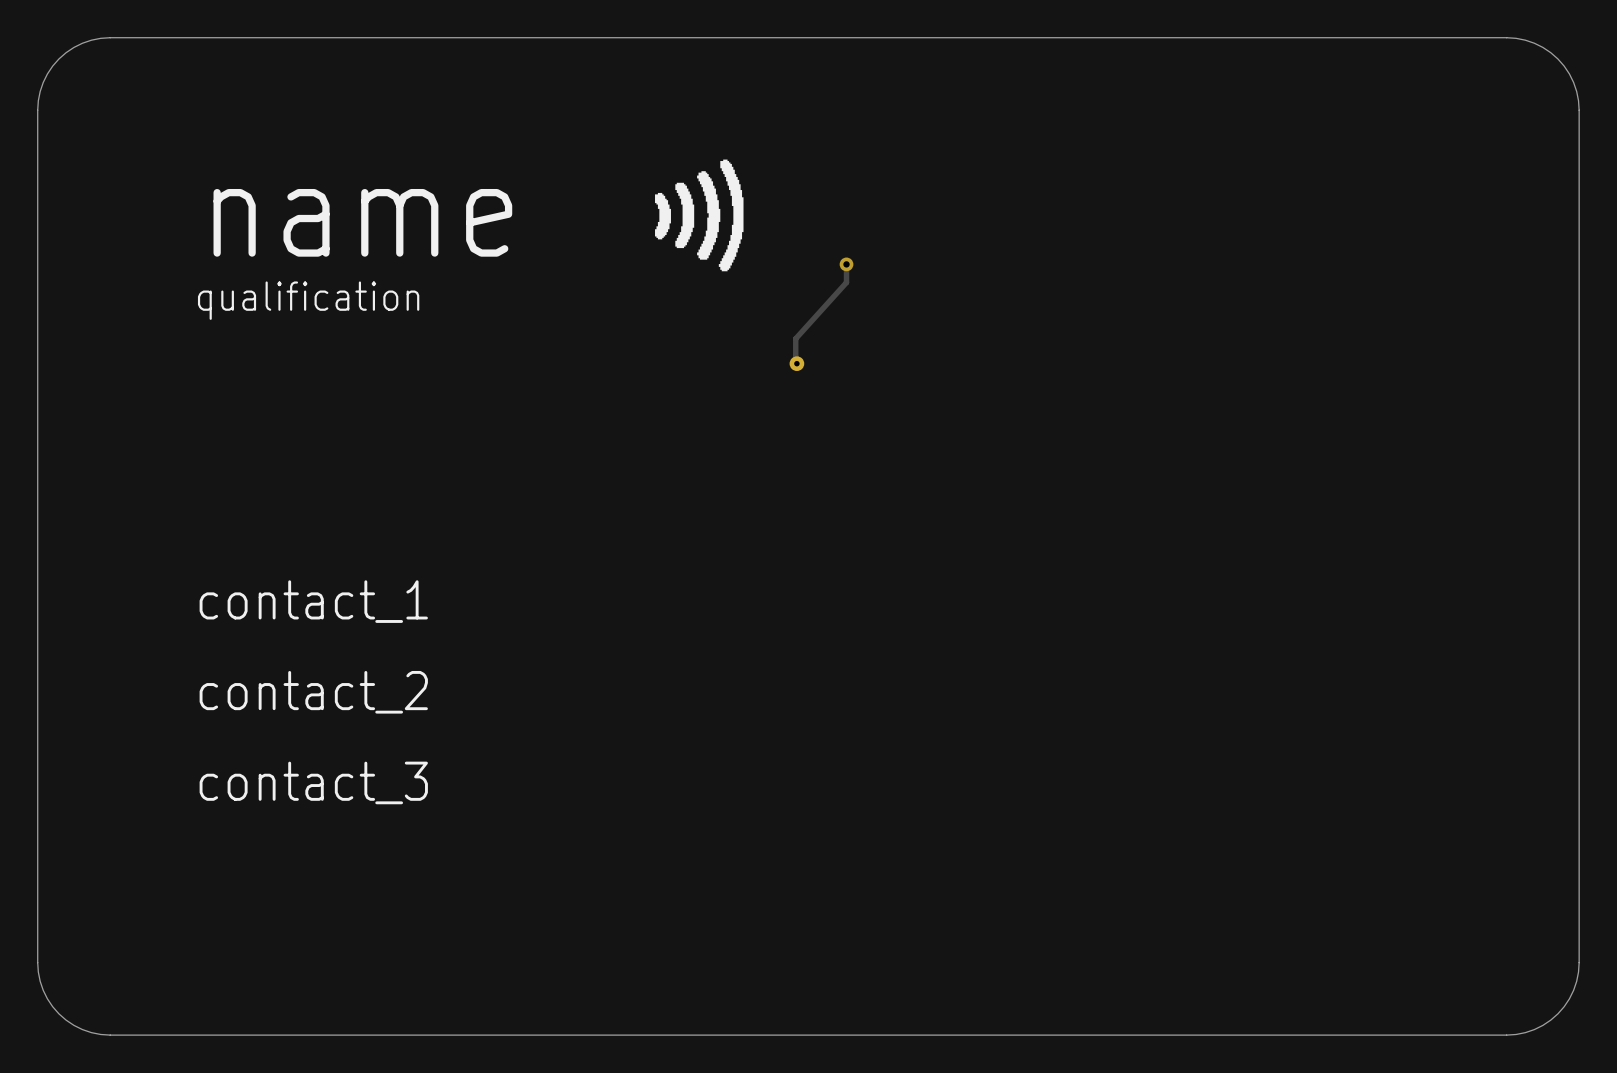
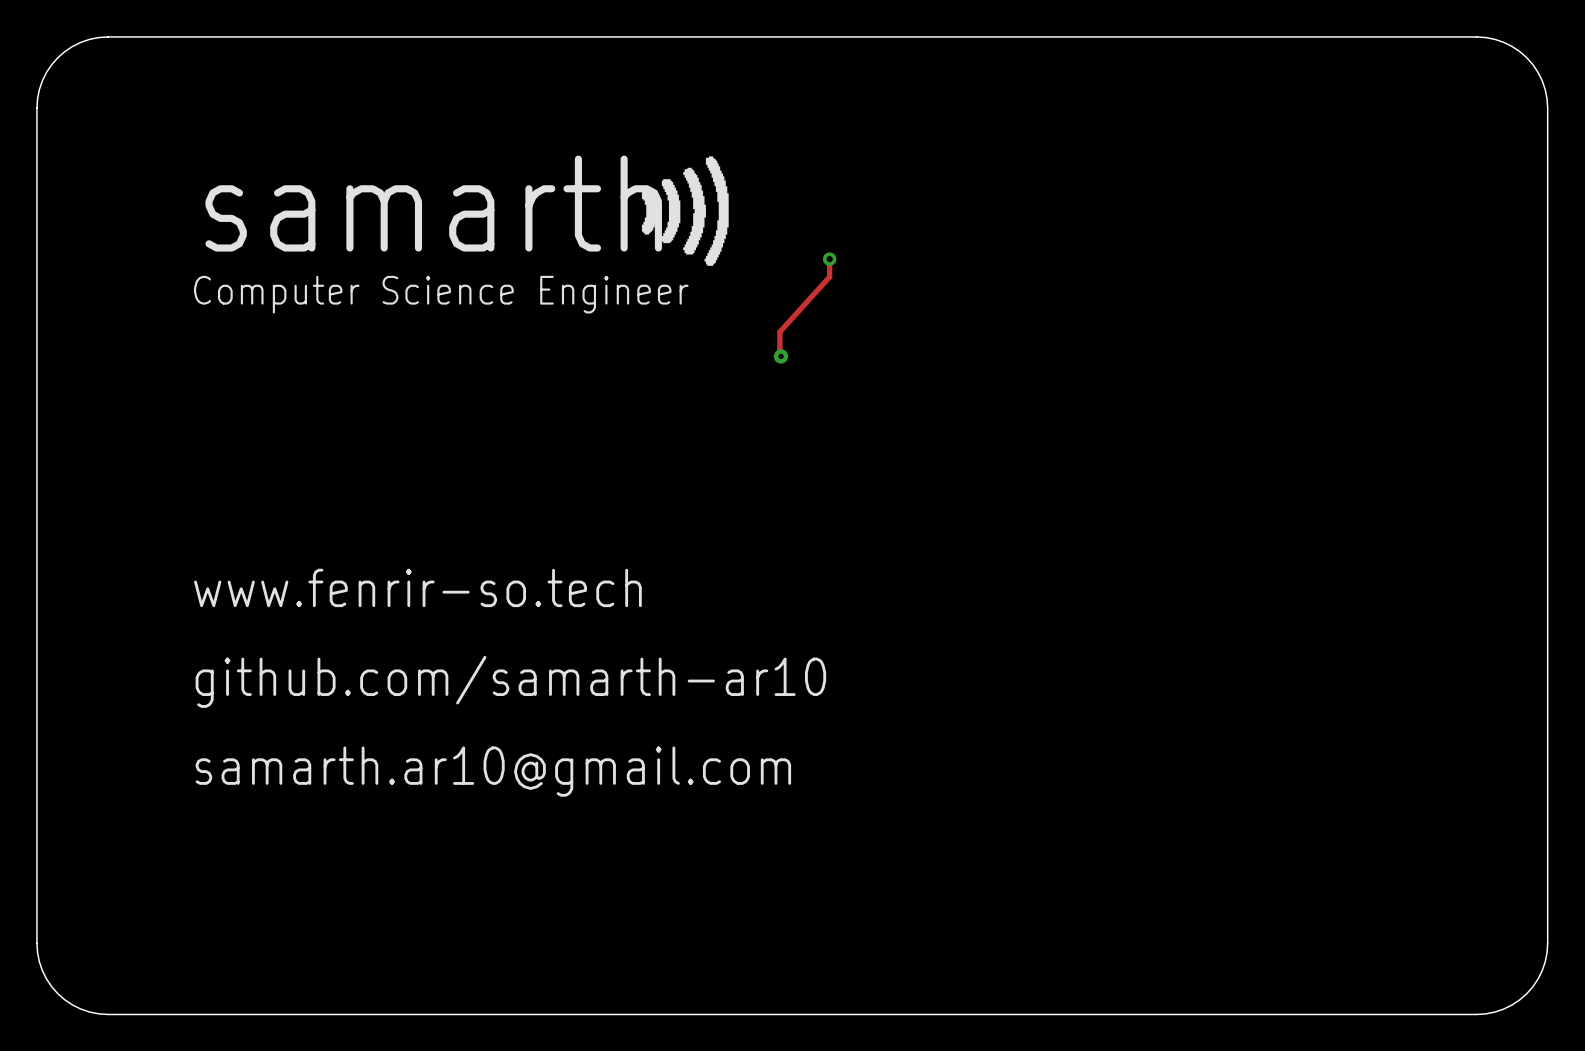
text: name (362, 222) -> samarth (433, 203)
text: qualification (308, 300) -> Computer Science Engineer (441, 294)
text: contact_1 (313, 601) -> www.fenrir-so.tech (417, 587)
text: contact_2 (313, 692) -> github.com/samarth-ar10 (510, 681)
text: contact_3 (313, 782) -> samarth.ar10@gmail.com (493, 771)

